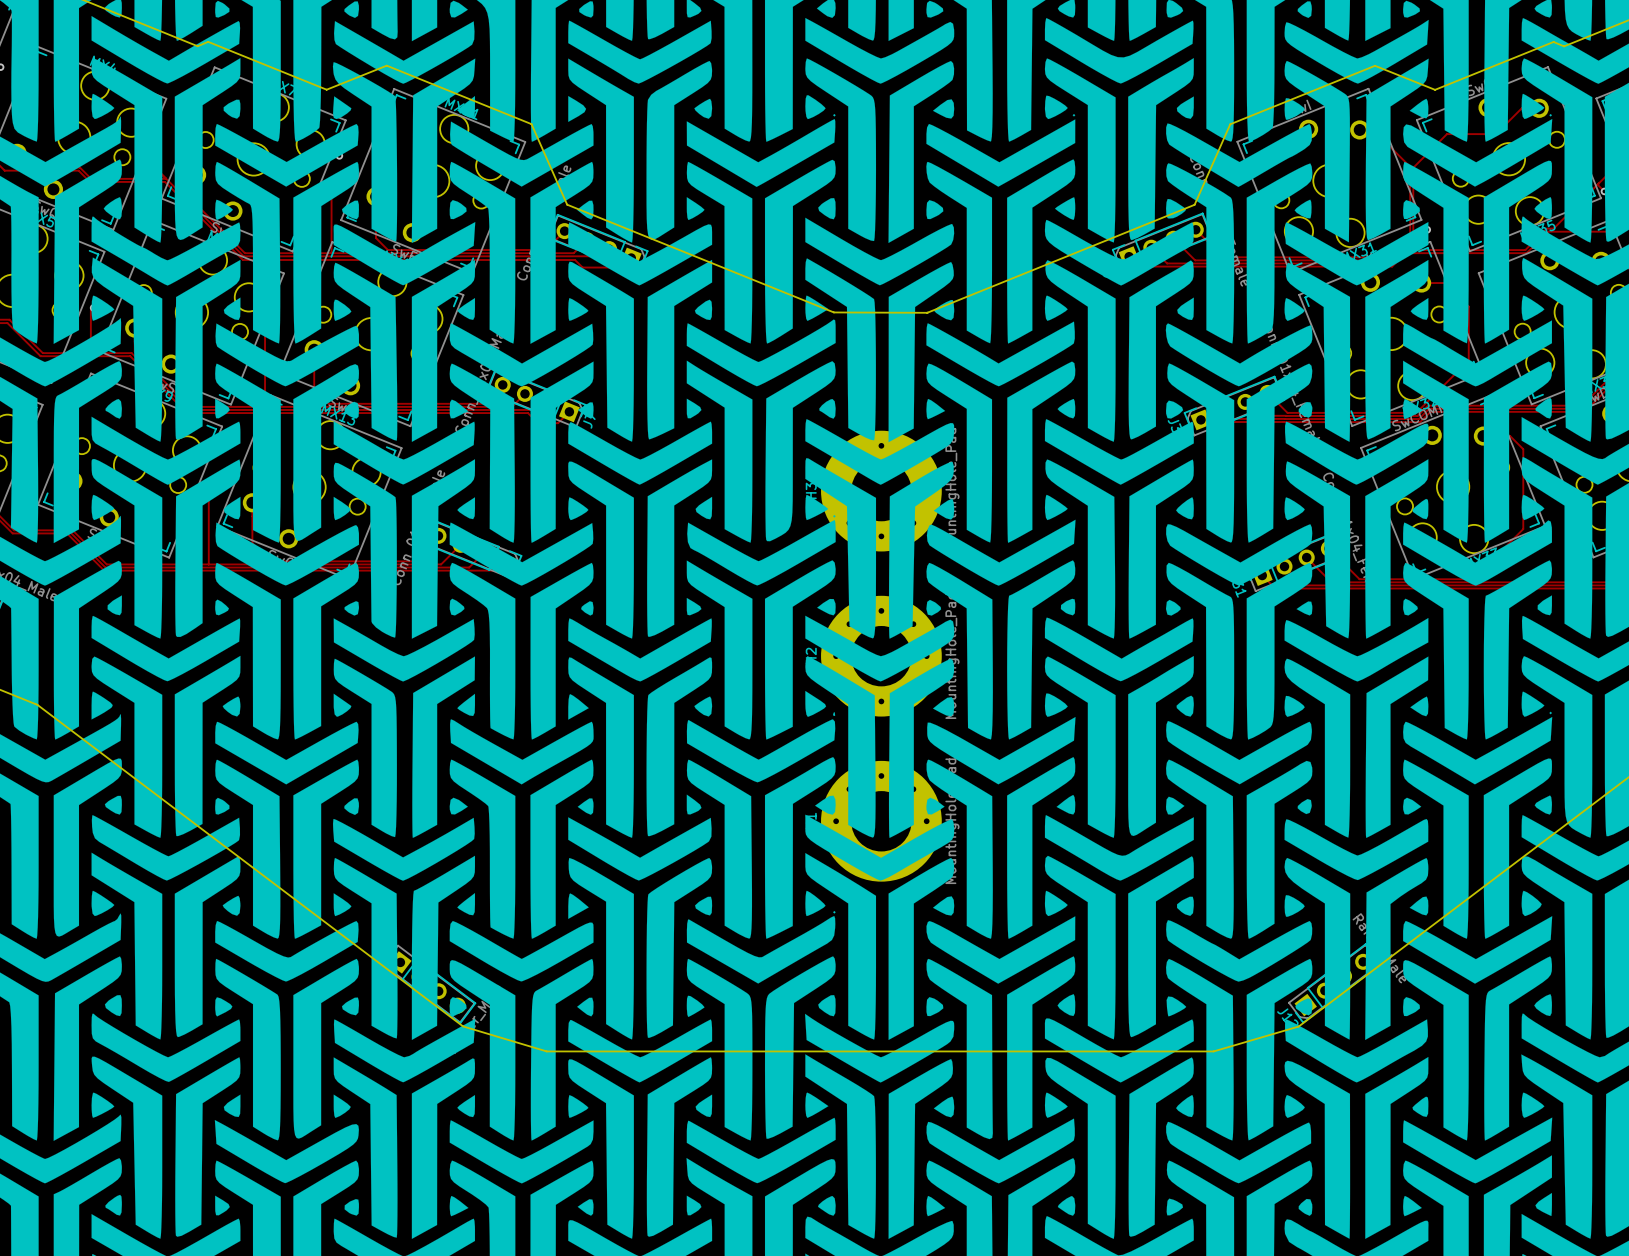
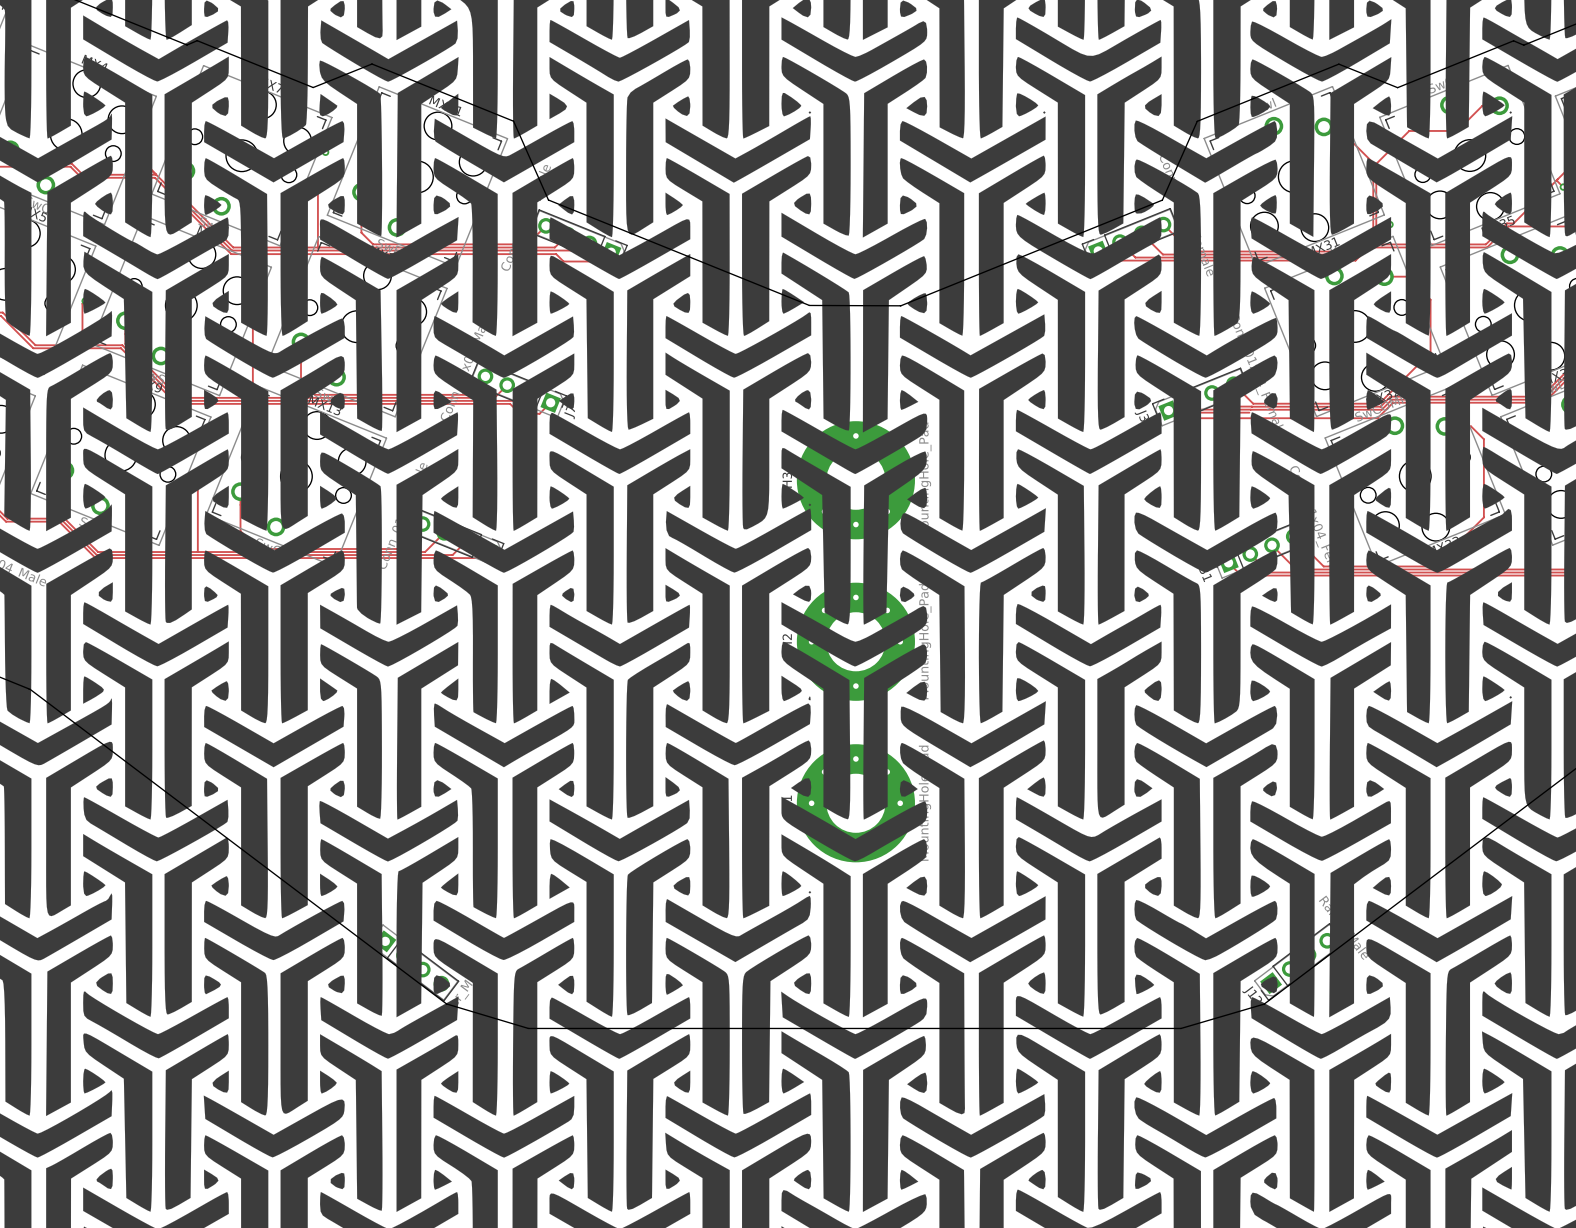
track: (1283, 422) (1420, 422) -> (1168, 410) (1176, 418) (1377, 418) (1383, 412)

